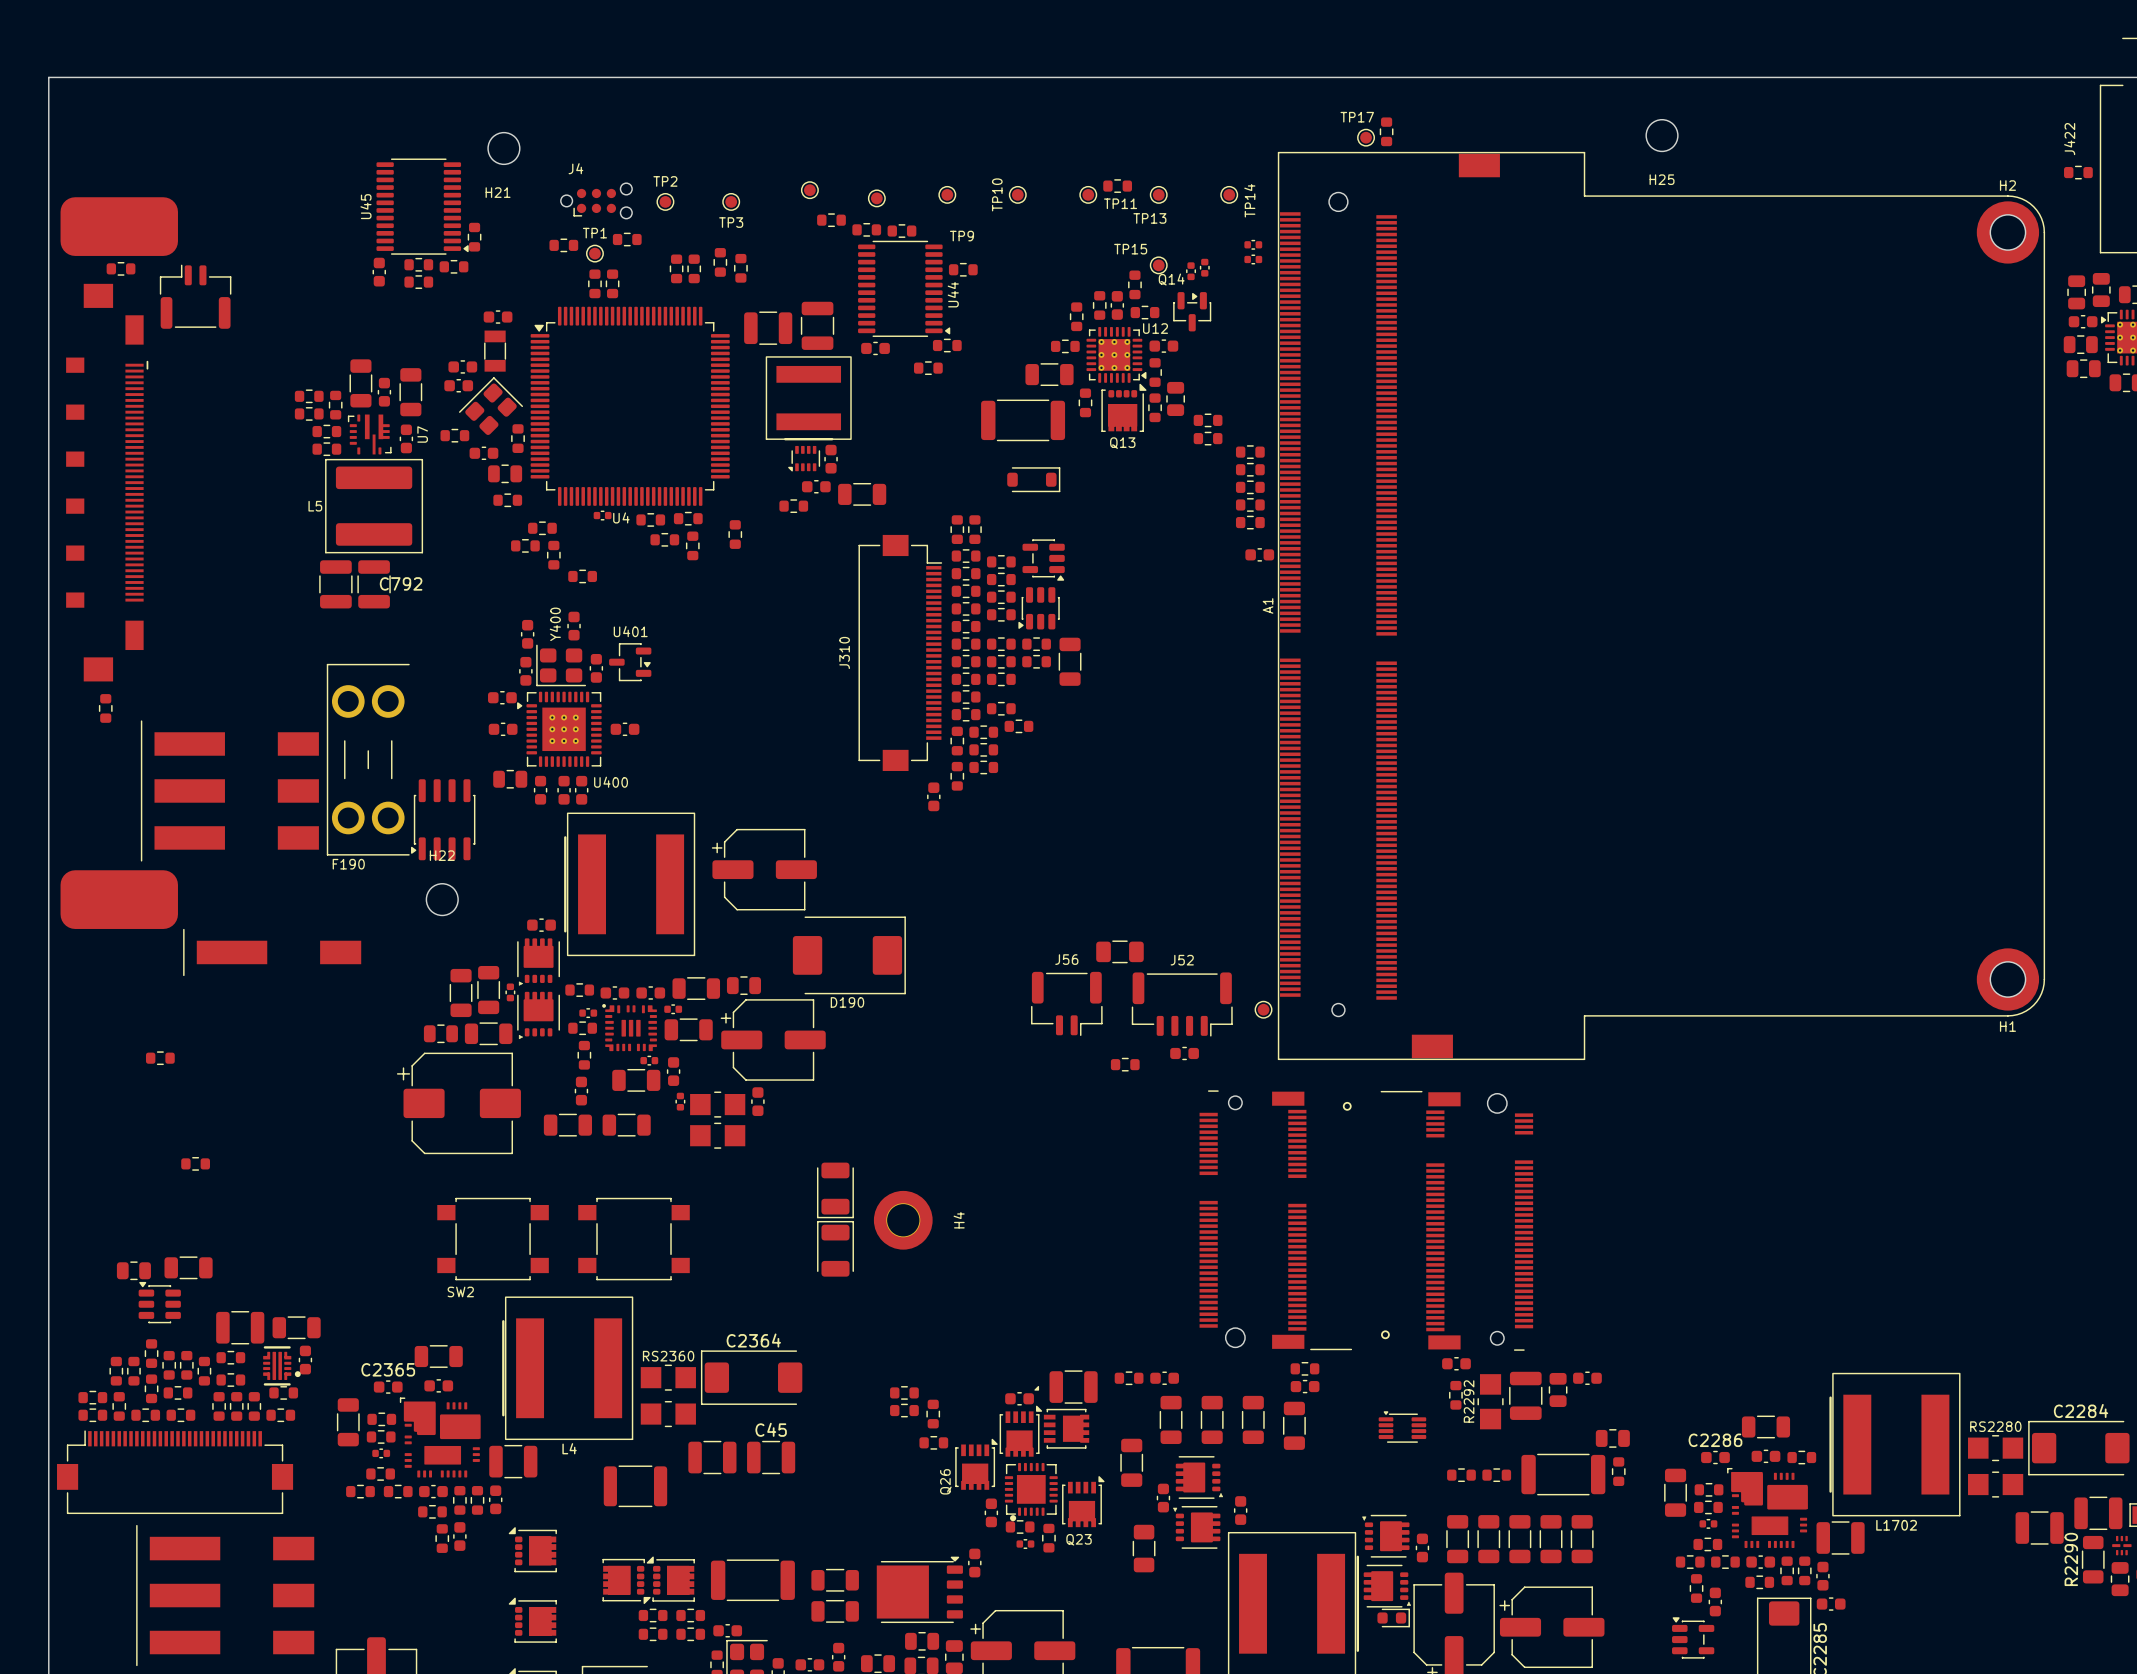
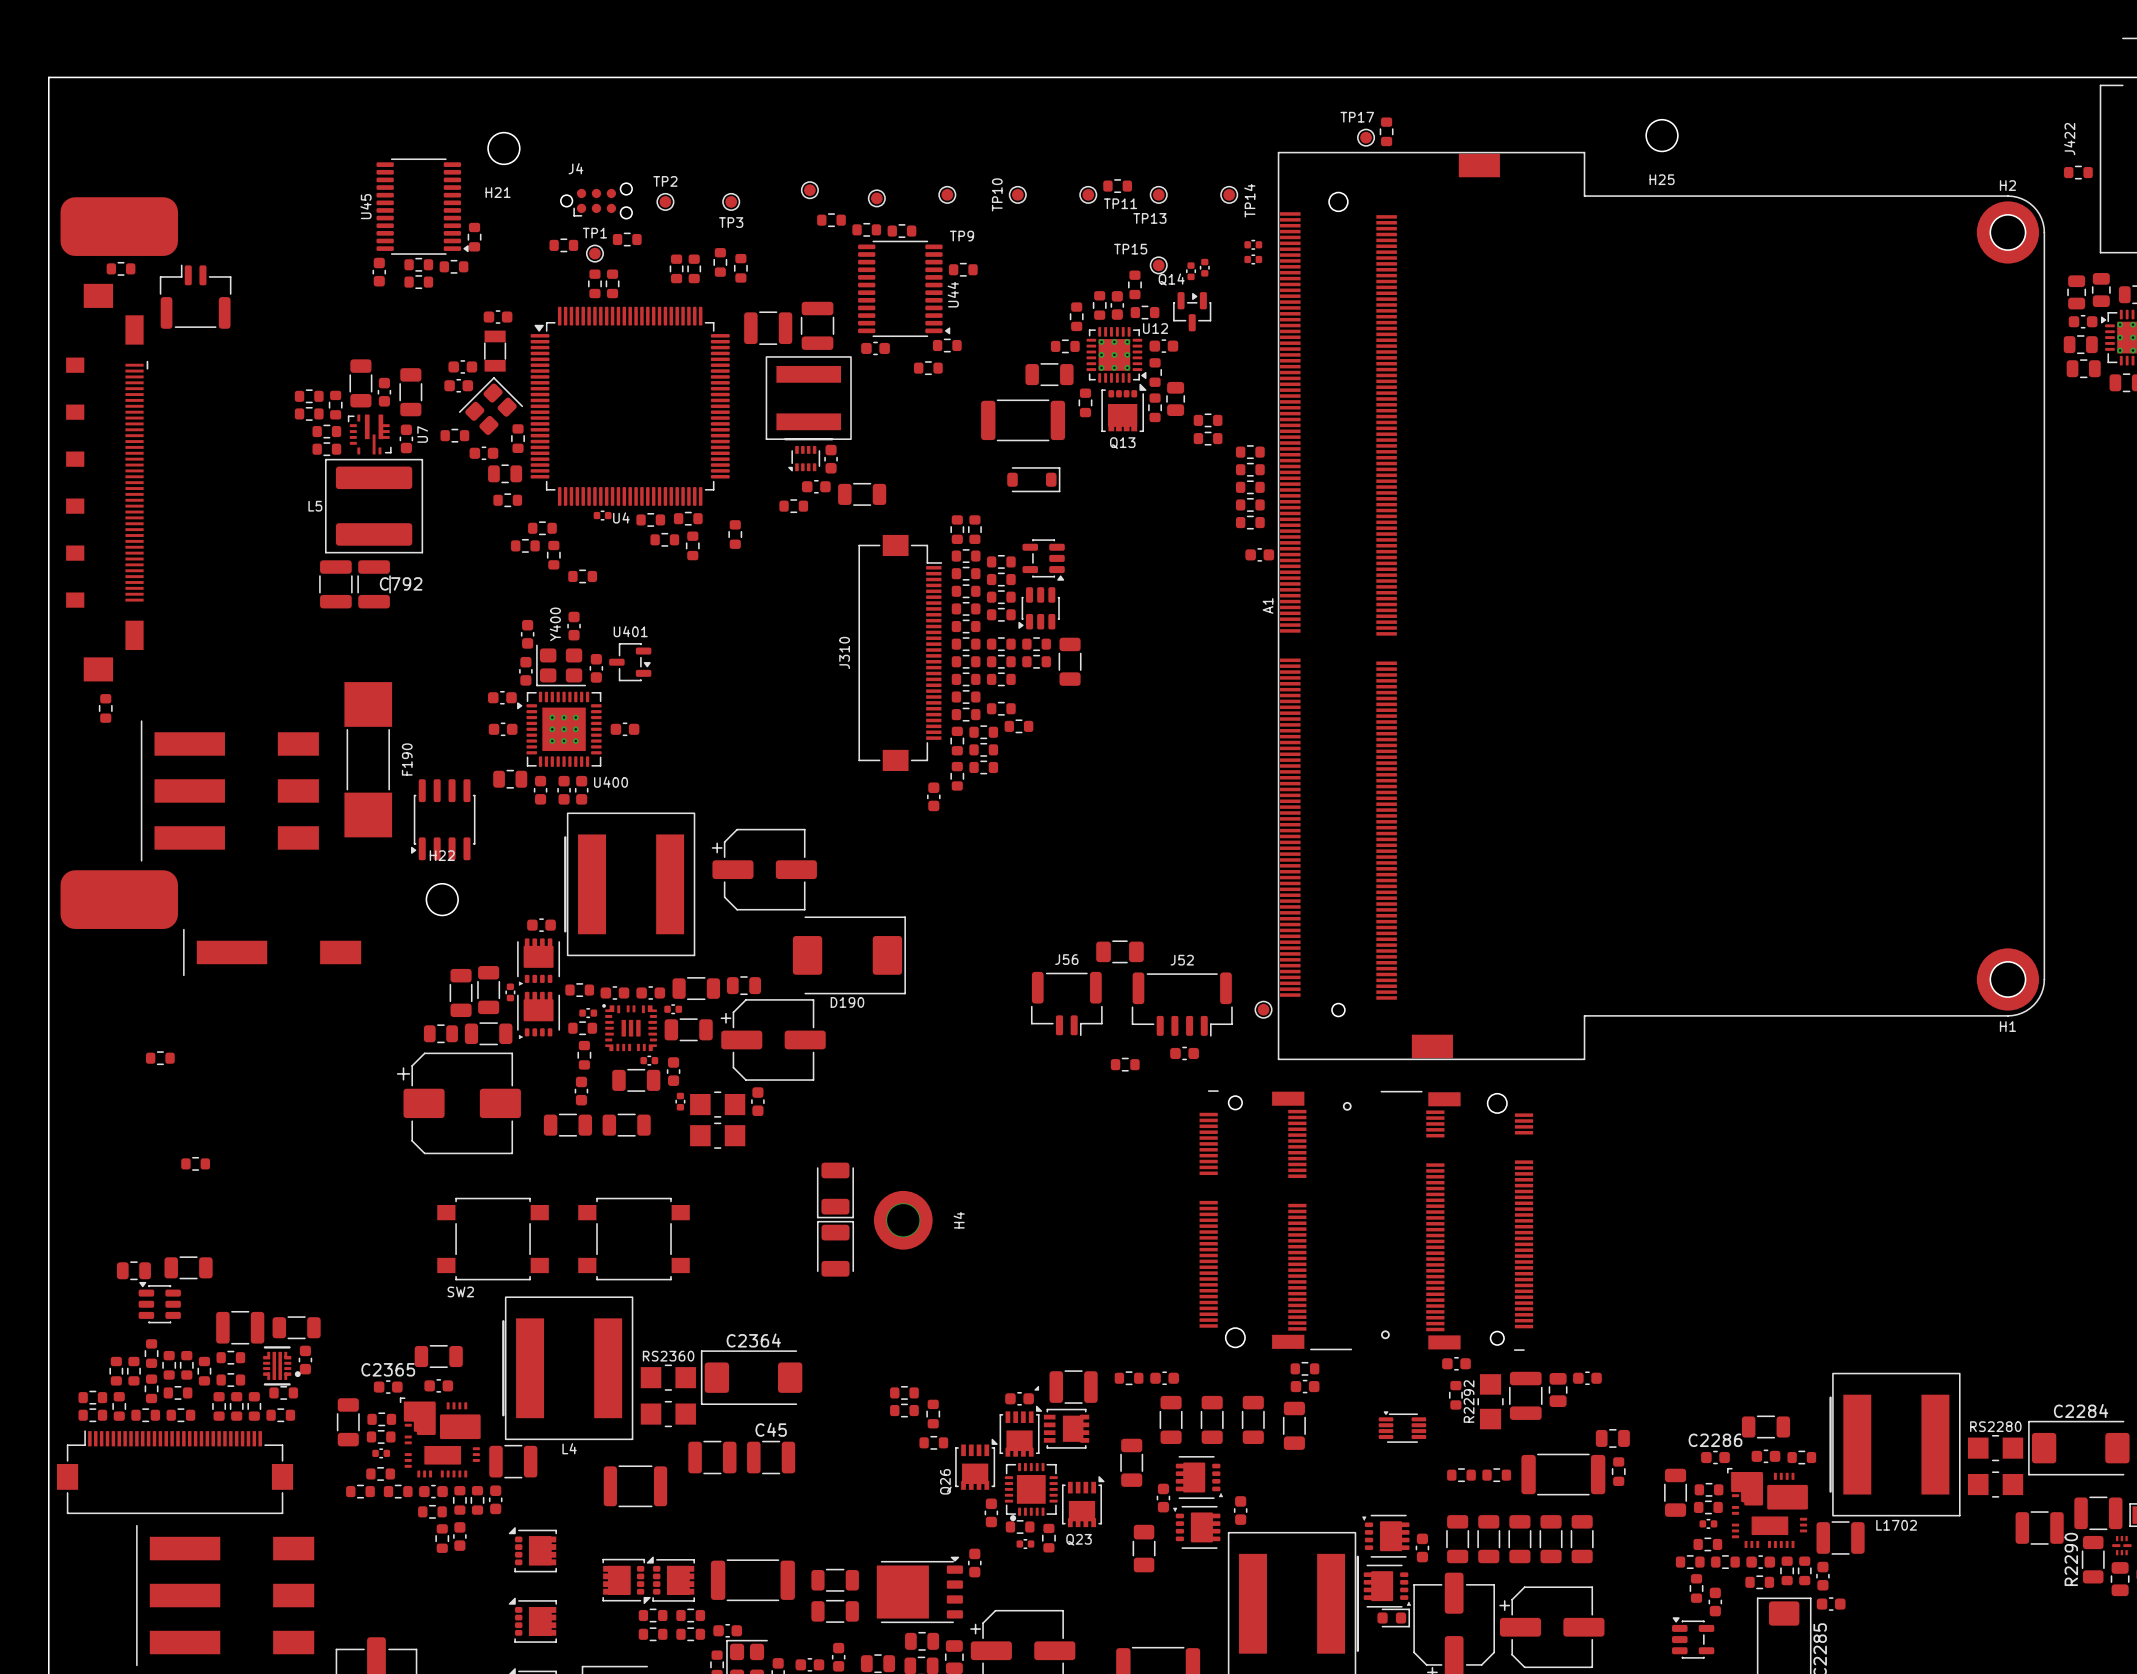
F190 footprint: [326, 663, 410, 856] -> [344, 682, 393, 838]
F190 name position: F190 (348, 864) -> F190 (407, 759)

